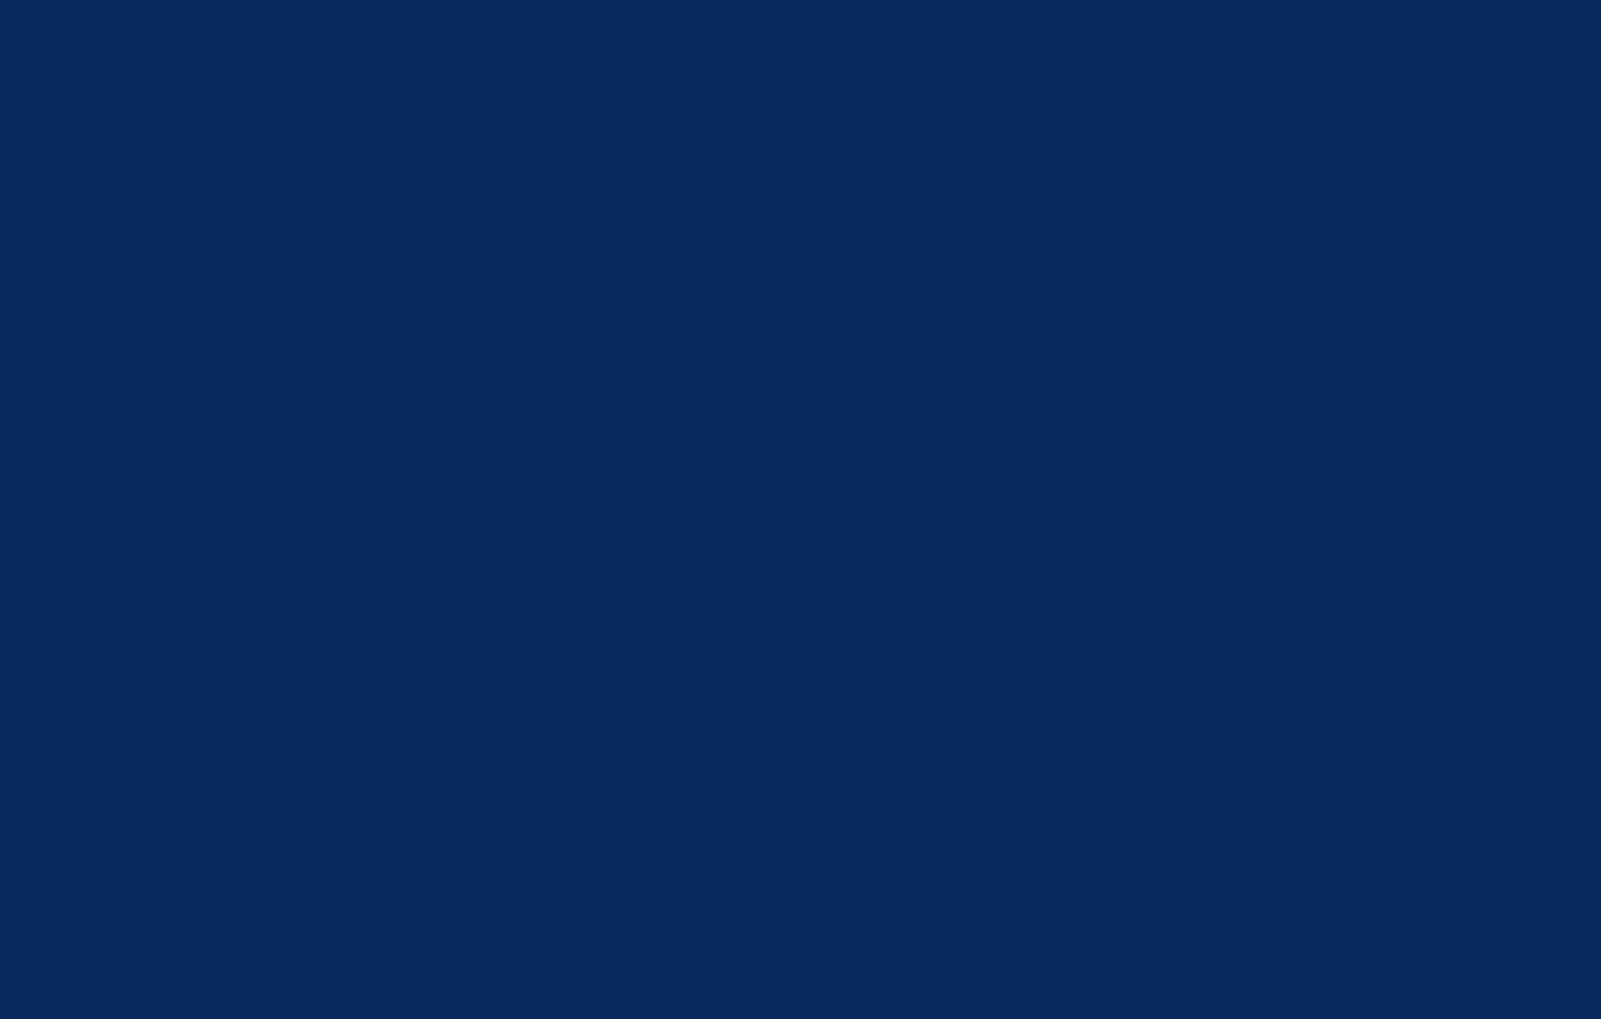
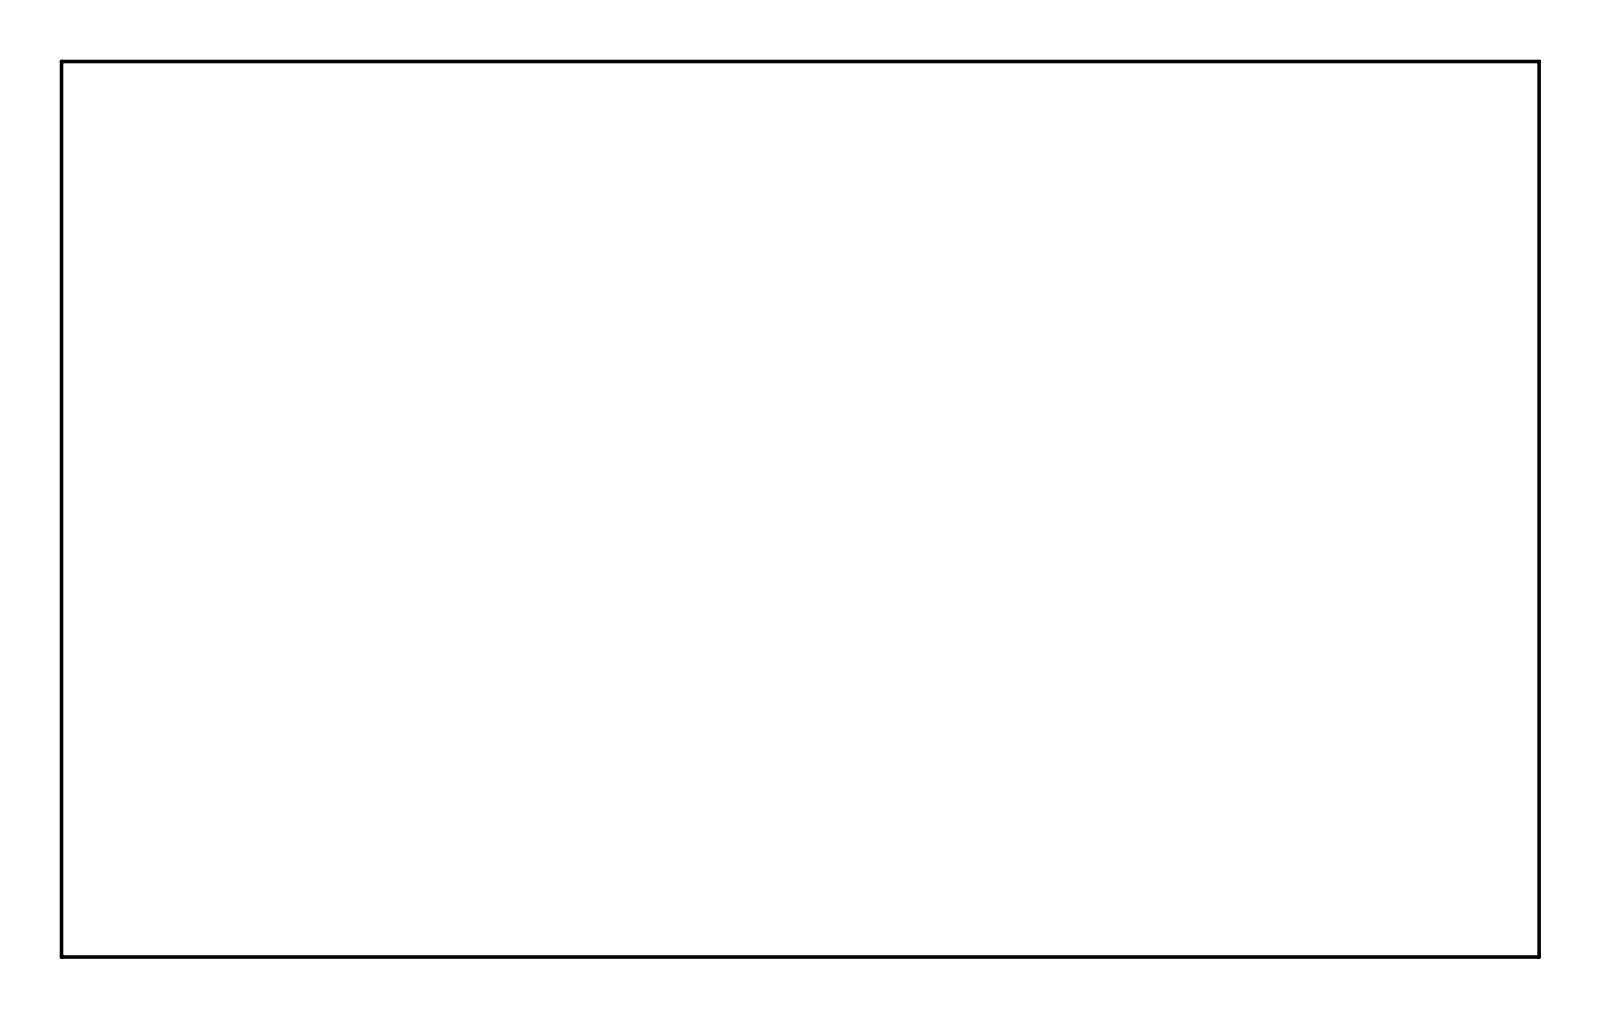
line: none -> (61, 61) (61, 957) (1539, 957) (1539, 61) (61, 61)

